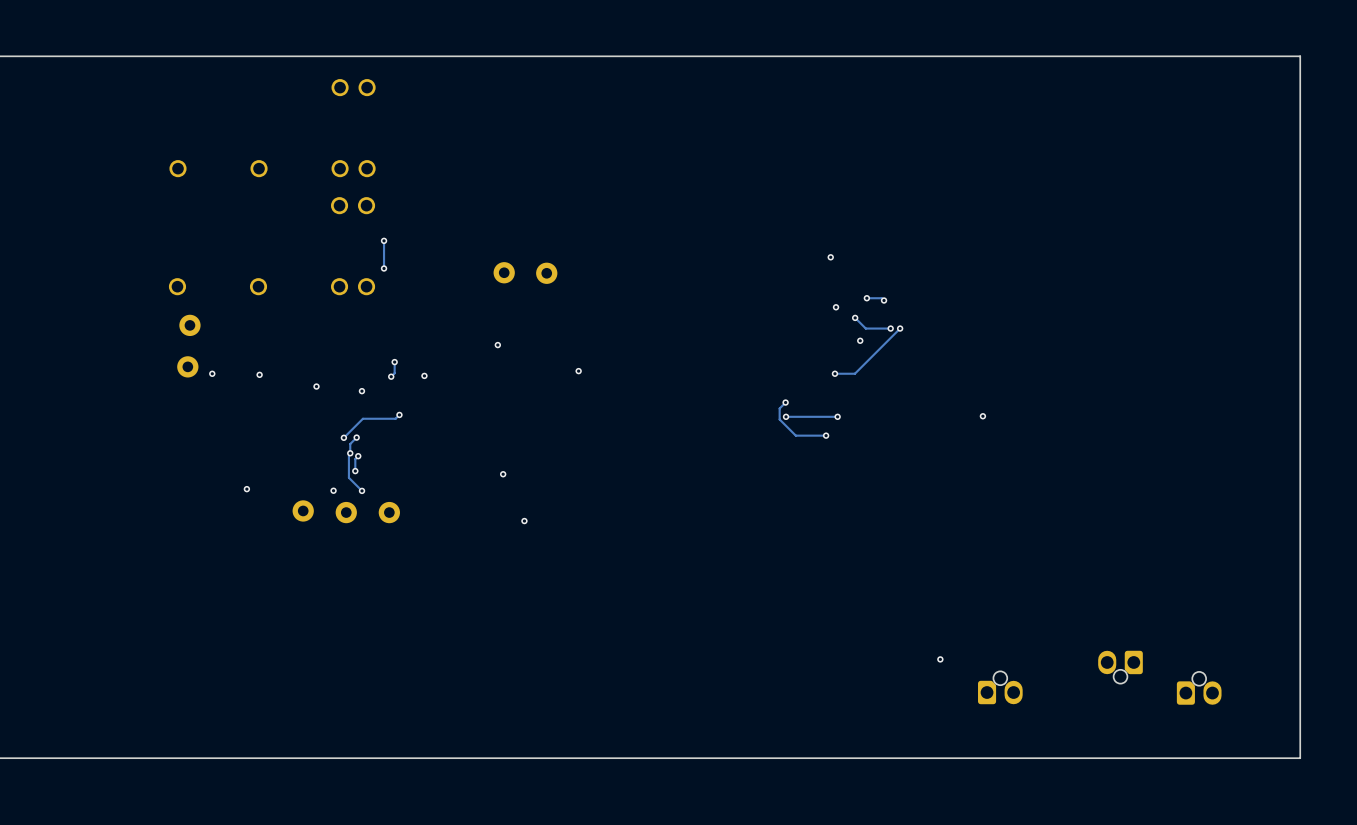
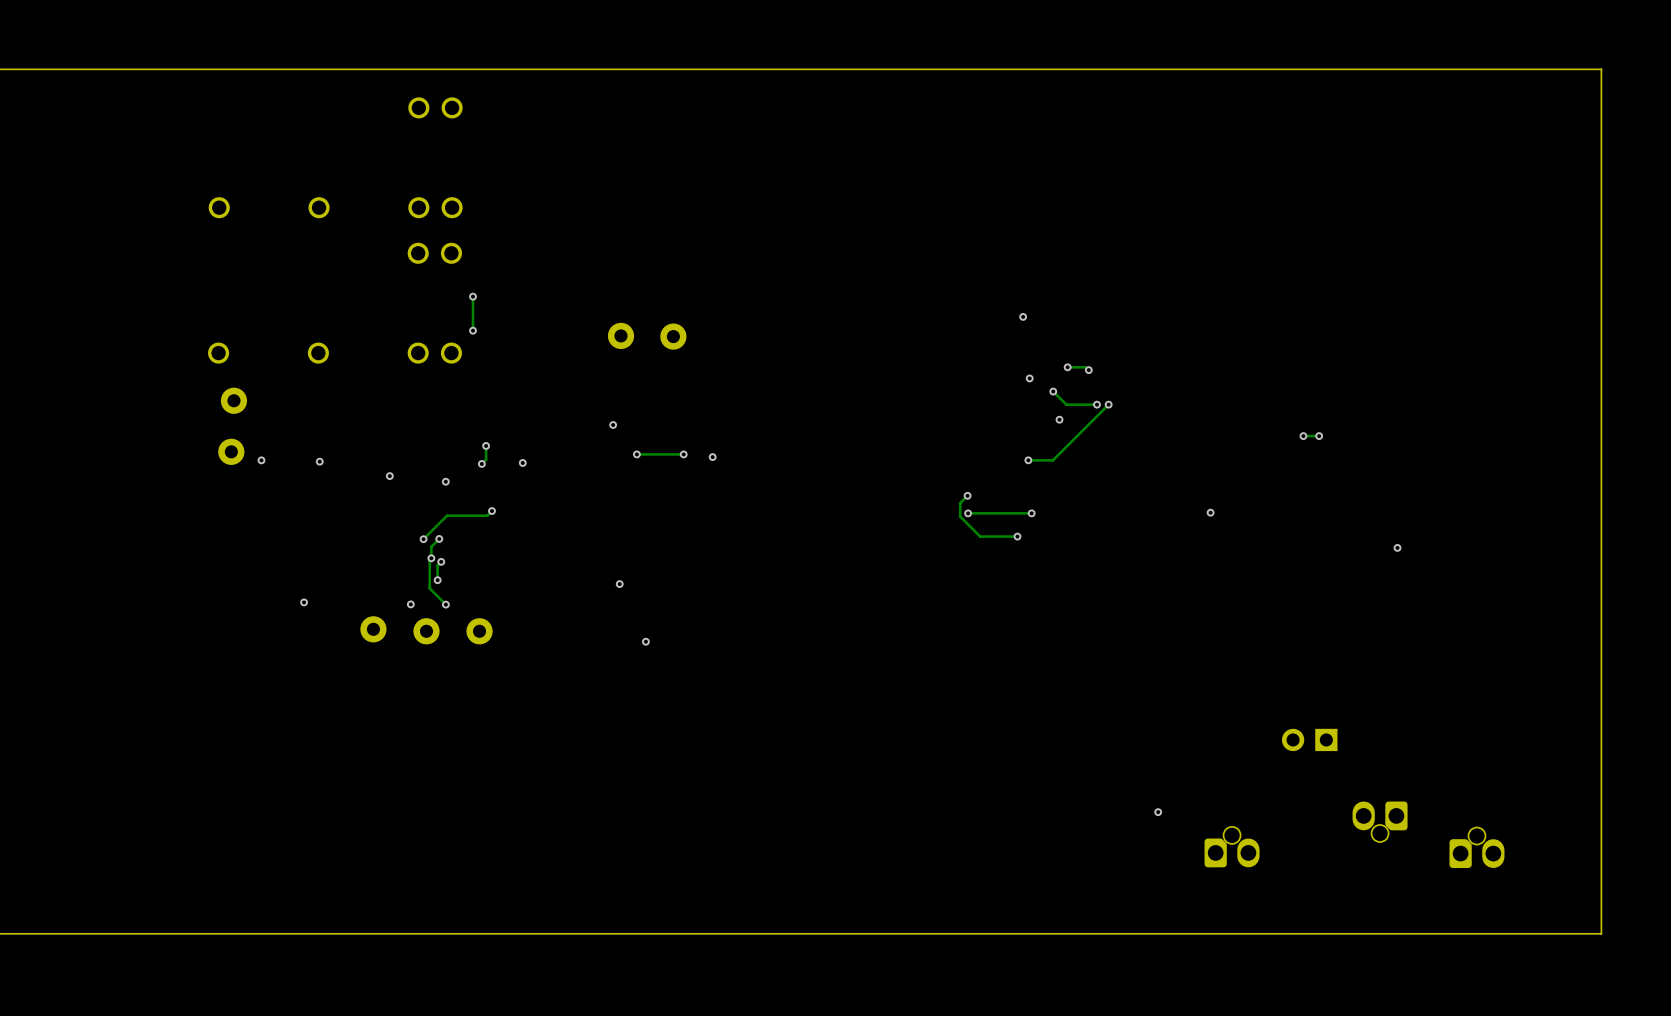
via: none -> (1303, 436)
track: none -> (1319, 436) (1303, 436)
via: none -> (1319, 436)
via: none -> (636, 454)
track: none -> (683, 454) (636, 454)
via: none -> (683, 454)
via: none -> (1397, 547)
part: none -> (1309, 739)

